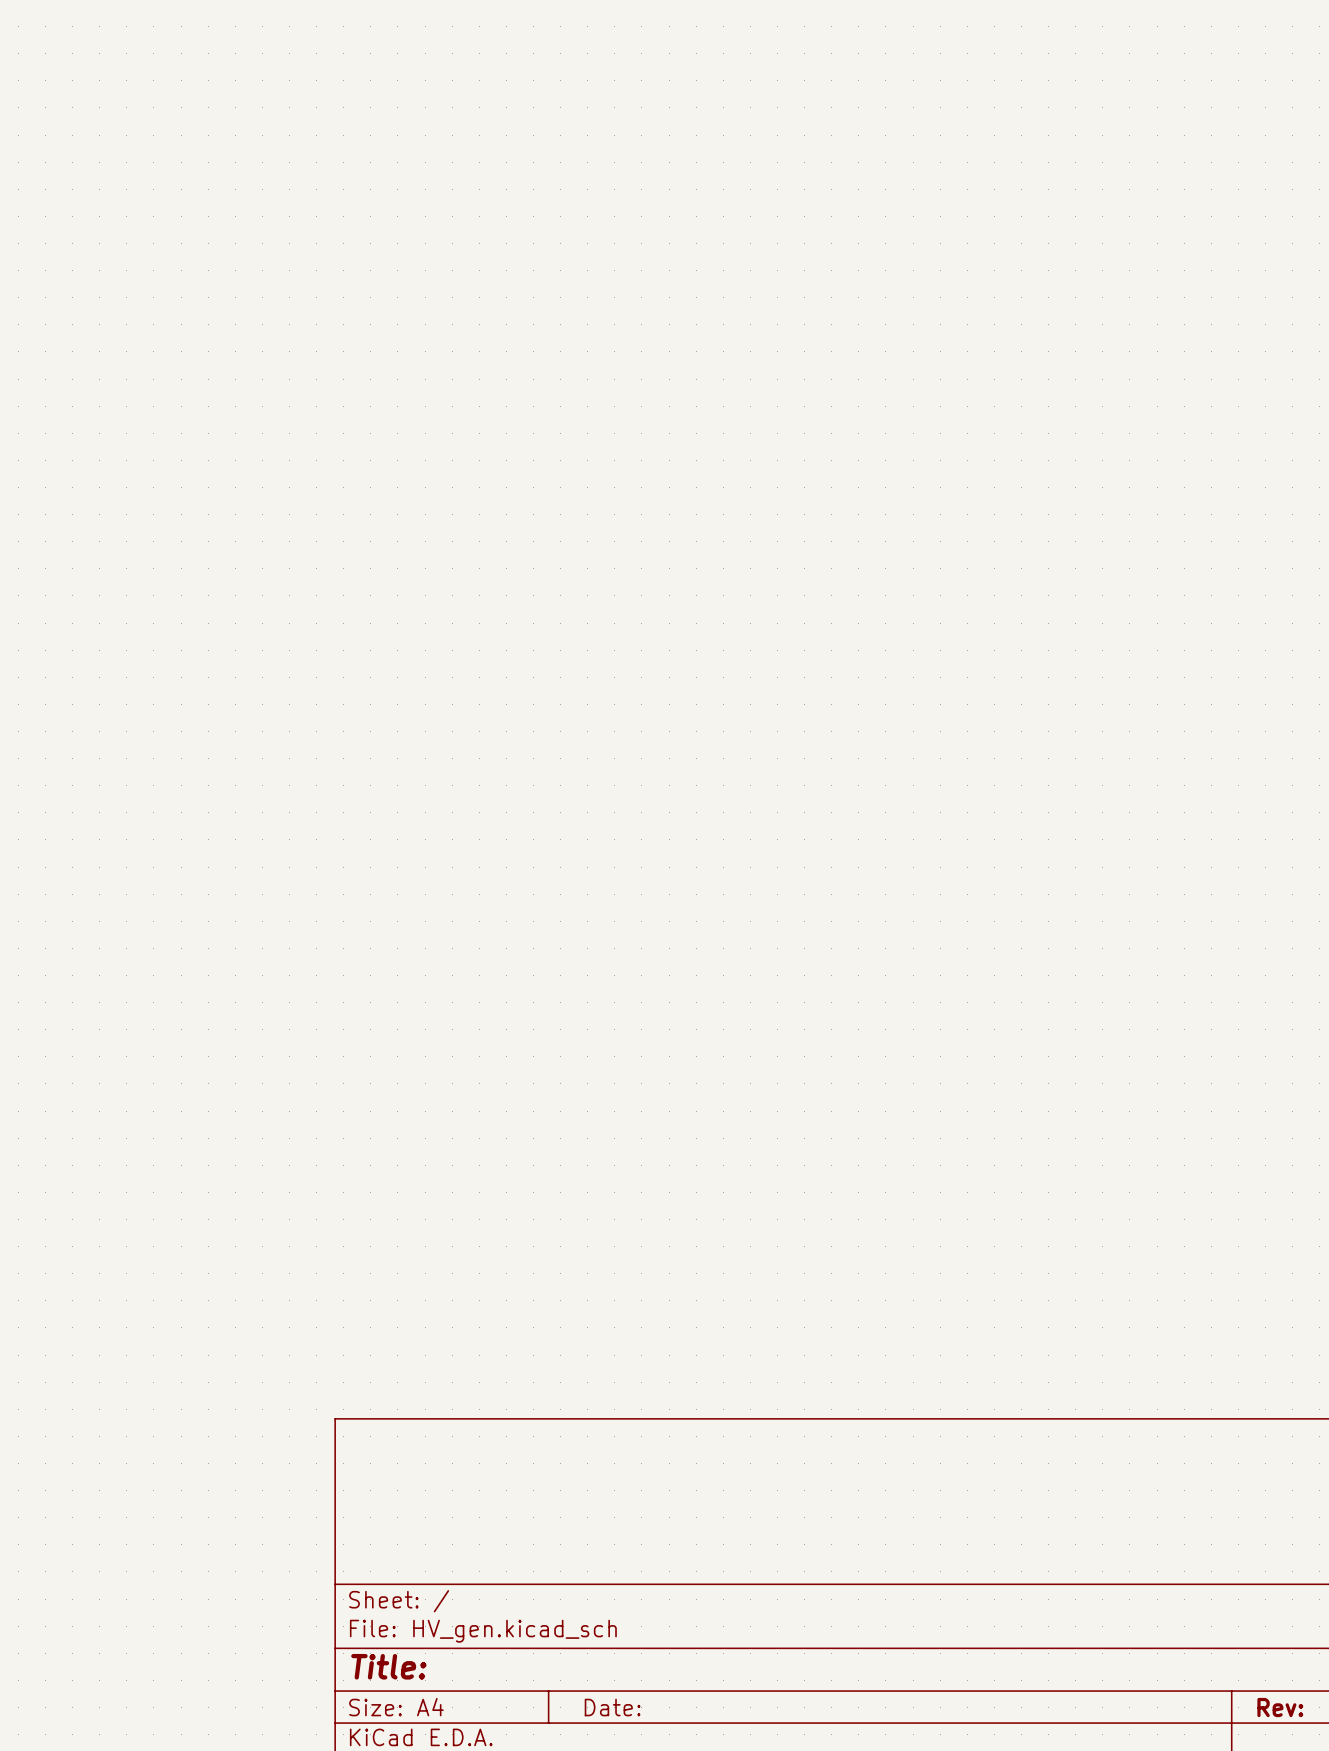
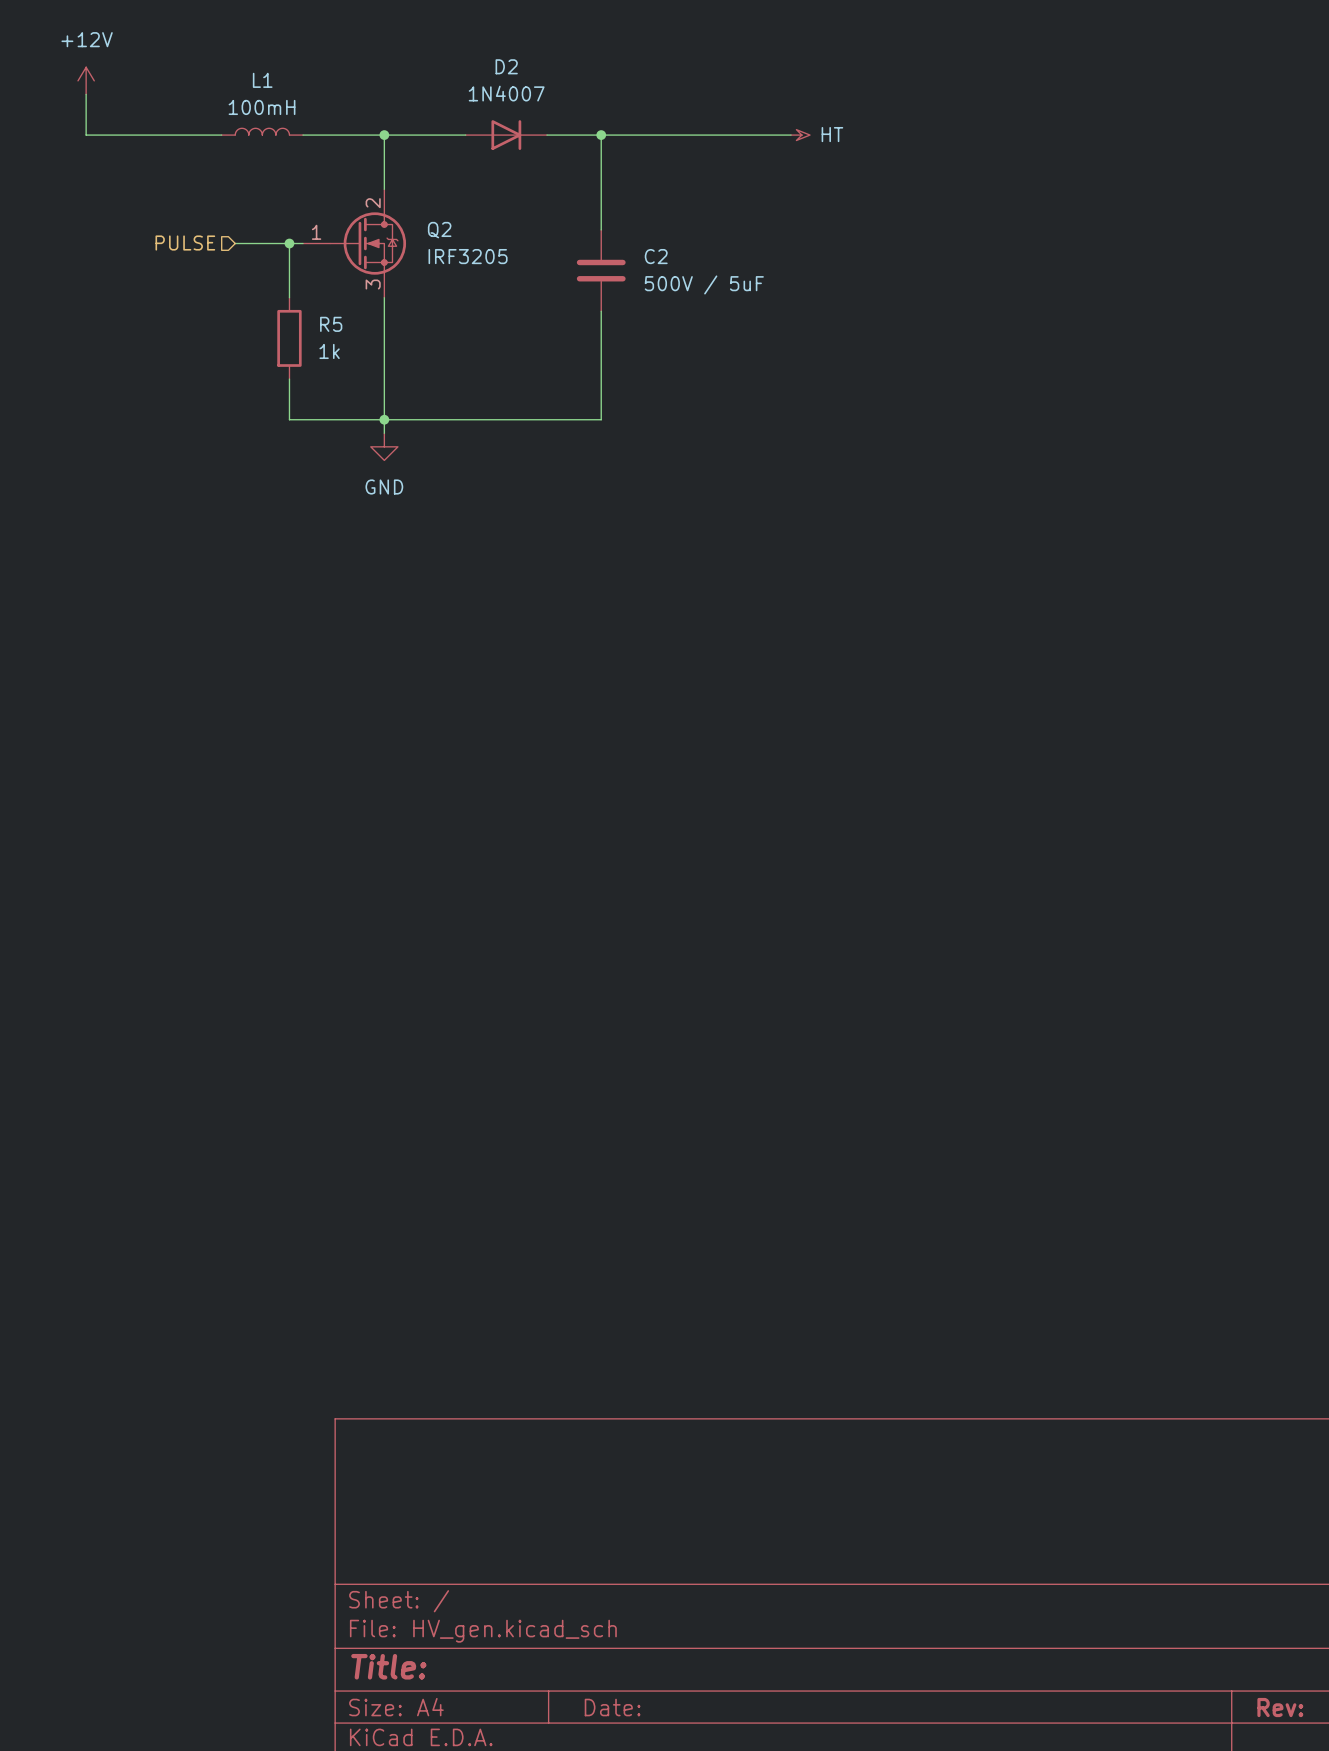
power symbol: none -> +12V (86, 80)
wire: none -> (86, 94) (86, 135) (221, 135)
L1: none -> 100mH (262, 131)
wire: none -> (303, 135) (465, 135)
wire: none -> (384, 135) (384, 189)
junction: none -> (384, 135)
D2: none -> 1N4007 (506, 135)
wire: none -> (547, 135) (791, 135)
wire: none -> (601, 135) (601, 229)
junction: none -> (601, 135)
power symbol: none -> HT (800, 135)
hierarchical label: none -> PULSE (185, 243)
wire: none -> (235, 243) (303, 243)
wire: none -> (289, 243) (289, 297)
junction: none -> (289, 243)
Q2: none -> IRF3205 (354, 243)
C2: none -> 500V / 5uF (601, 270)
wire: none -> (384, 297) (384, 433)
wire: none -> (601, 311) (601, 419) (289, 419) (289, 379)
R5: none -> 1k (289, 338)
junction: none -> (384, 419)
power symbol: none -> GND (384, 446)

